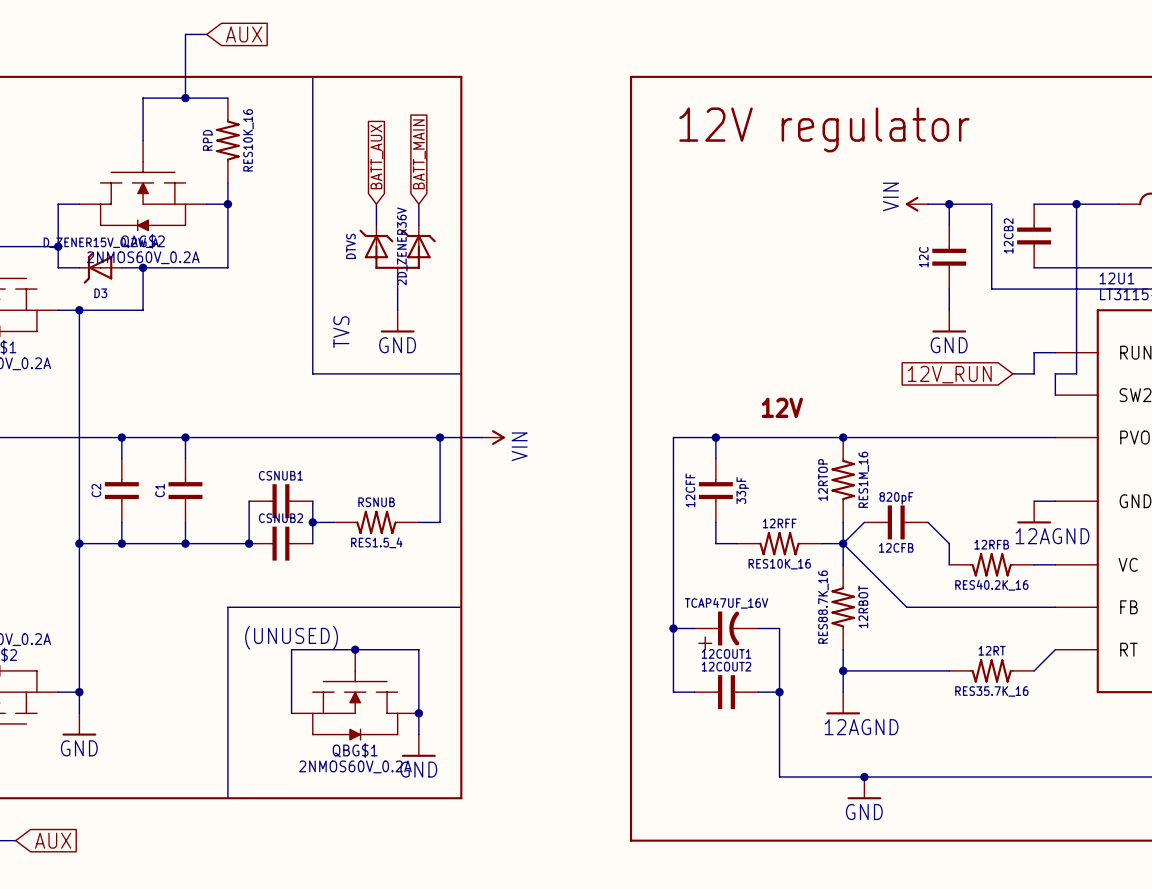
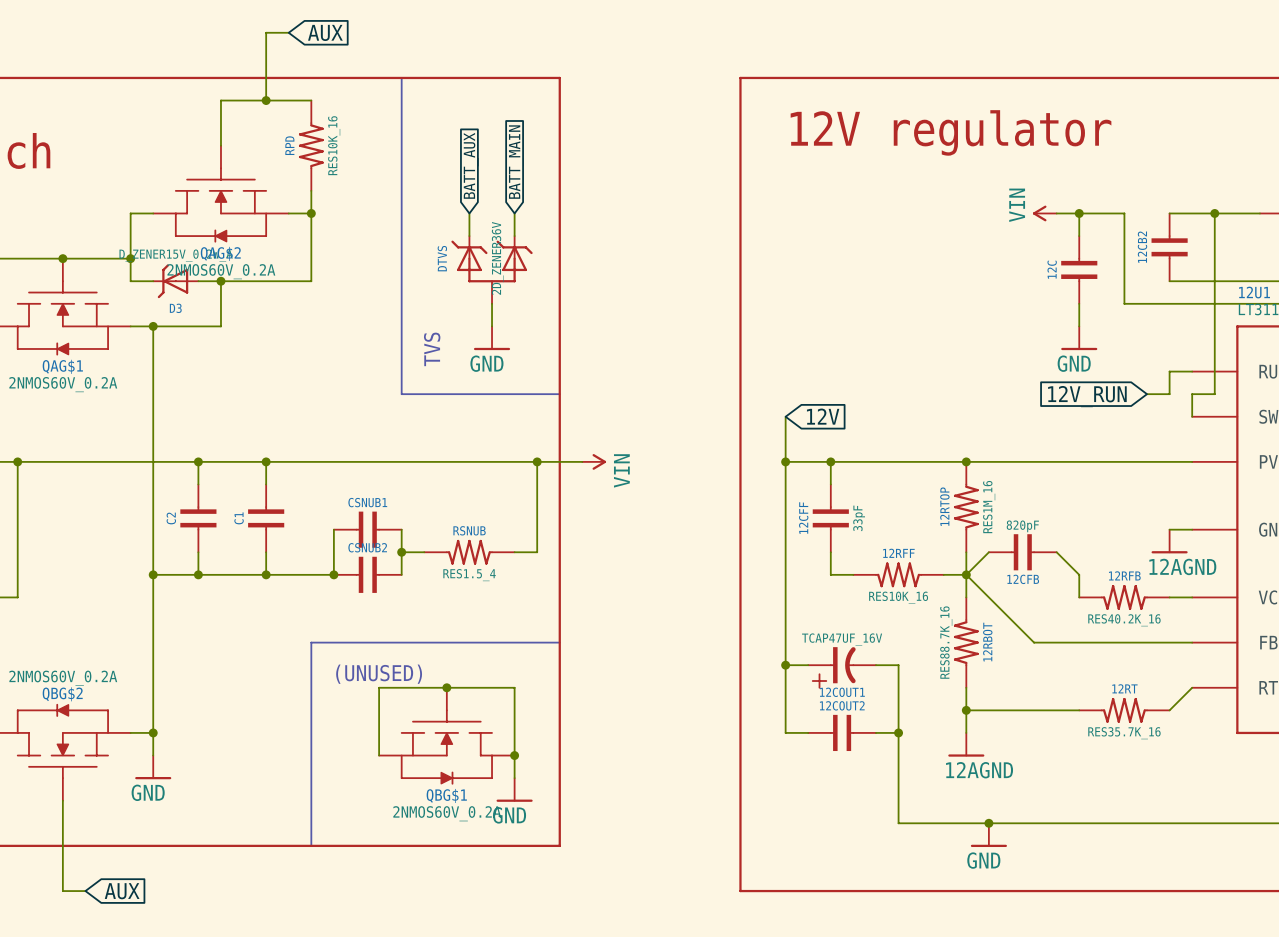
wire: none -> (785, 416) (785, 461)
global label: none -> 12V (823, 416)
label: 12V (782, 407) -> none
junction: none -> (785, 461)

